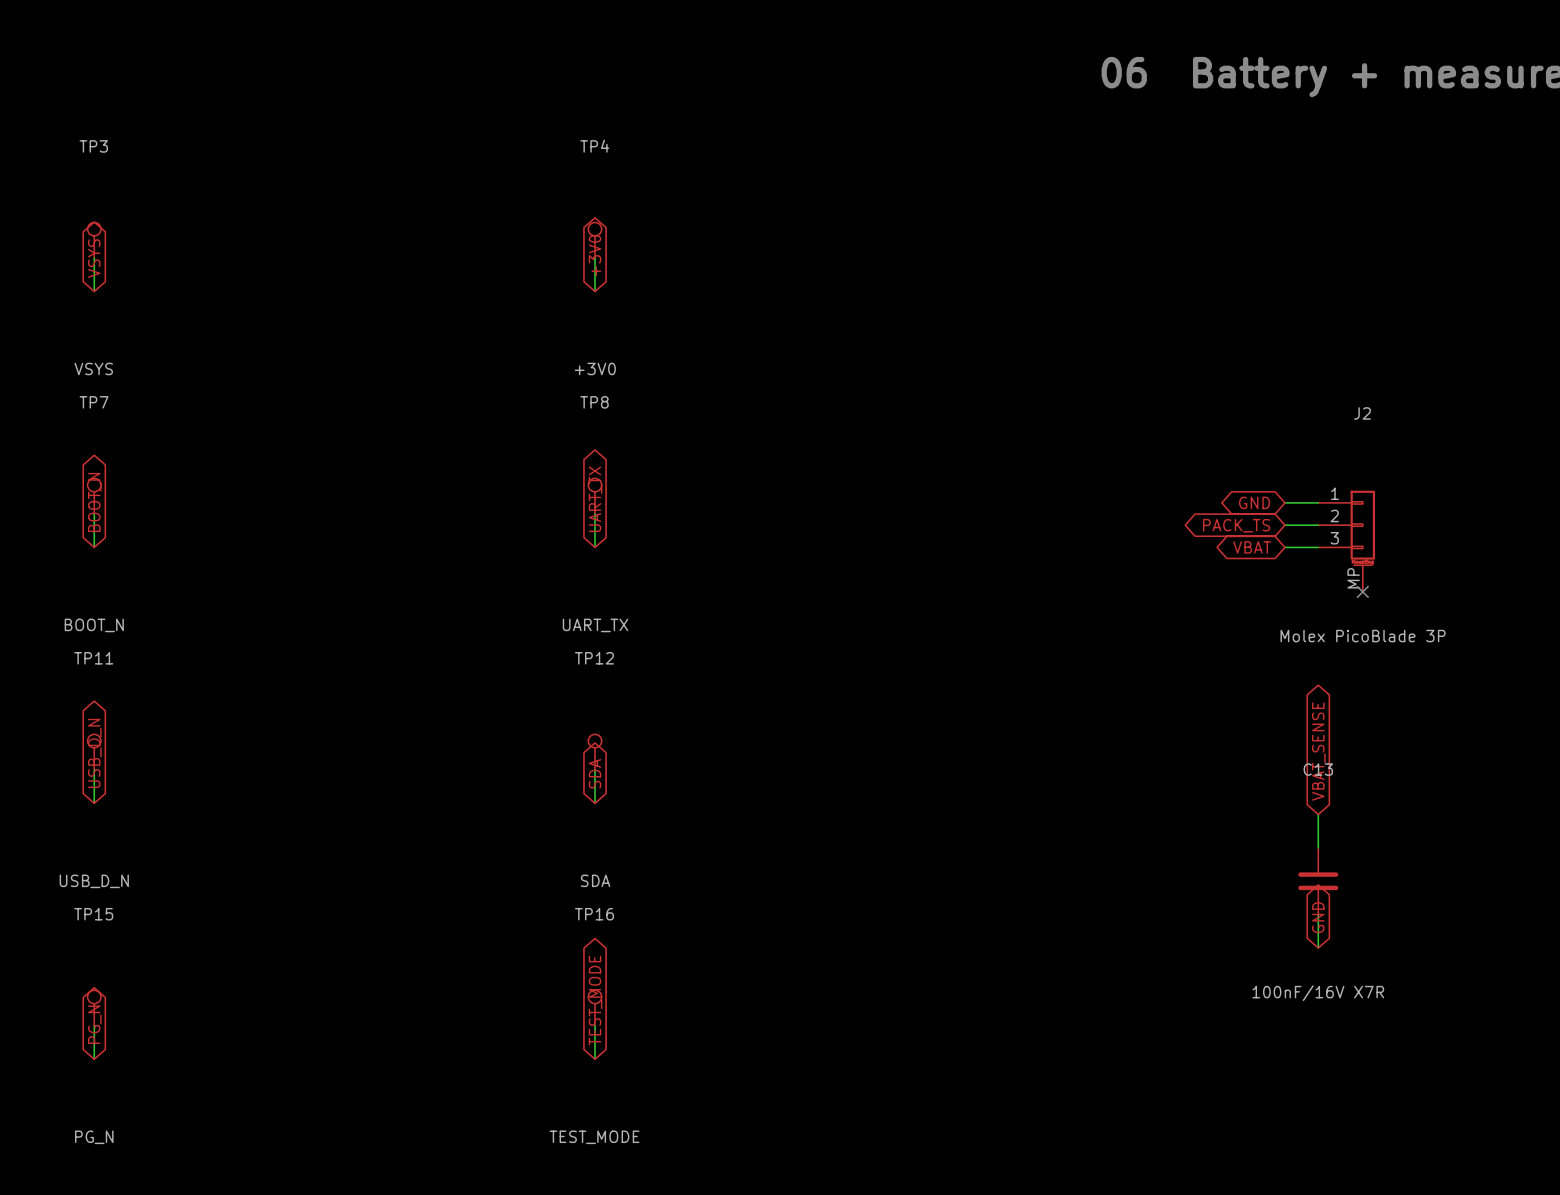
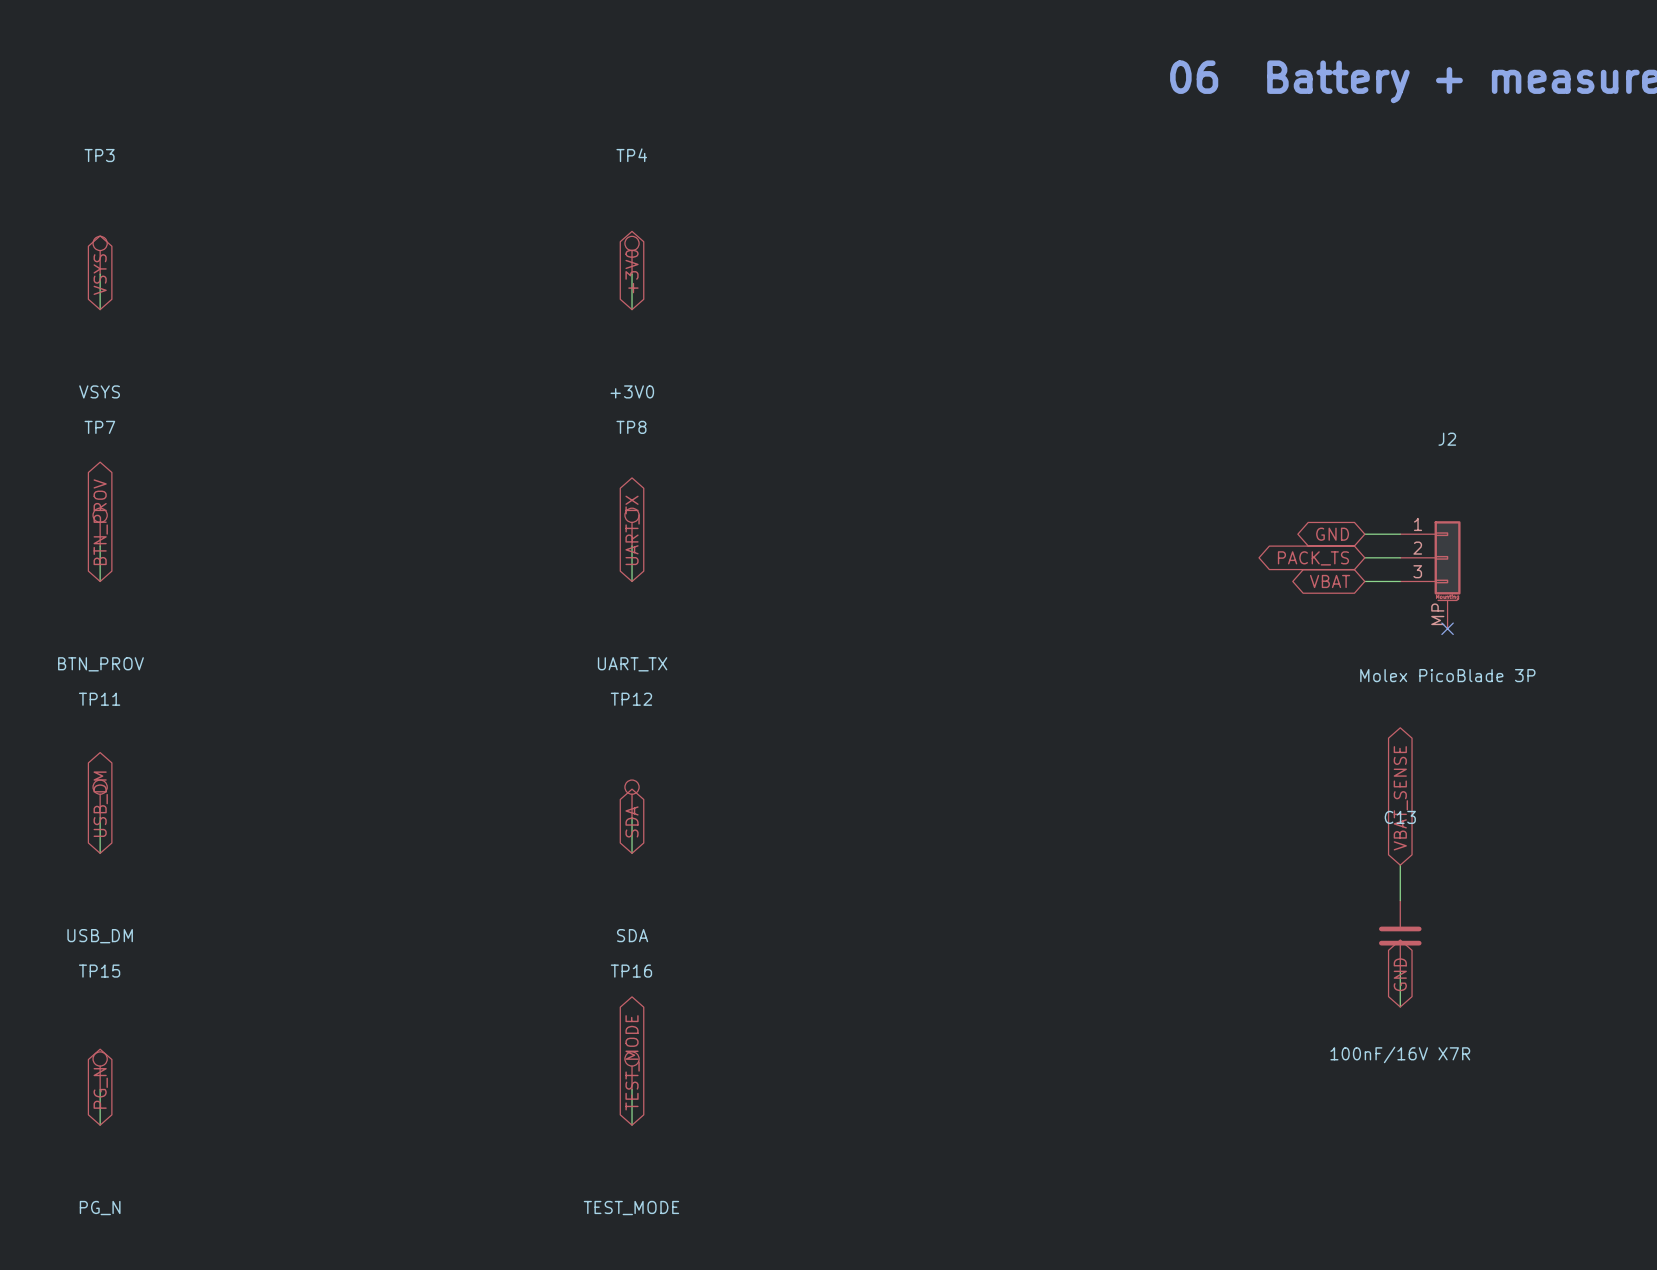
global label: BOOT_N (94, 502) -> BTN_PROV (100, 522)
TP7 value: BOOT_N (94, 625) -> BTN_PROV (100, 664)
global label: USB_D_N (94, 753) -> USB_DM (100, 804)
TP11 value: USB_D_N (94, 881) -> USB_DM (100, 936)

